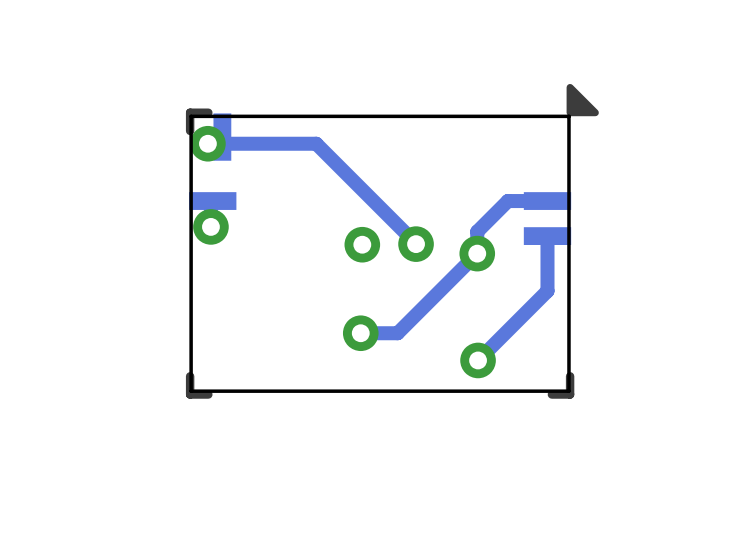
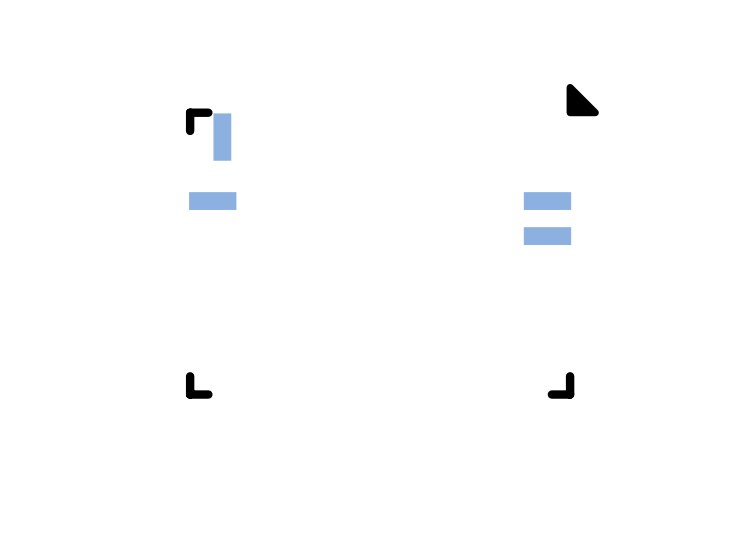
board edge: (568, 116) (191, 116) (191, 391) (568, 391) (568, 116) -> none
track: (207, 143) (316, 143) (416, 243) -> none
via: (207, 143) -> none
track: (547, 201) (507, 201) (477, 231) (477, 253) (397, 333) (360, 333) -> none
via: (210, 226) -> none
track: (547, 236) (547, 291) (478, 360) -> none
via: (362, 244) -> none
via: (416, 244) -> none
via: (477, 253) -> none
via: (360, 333) -> none
via: (478, 360) -> none

